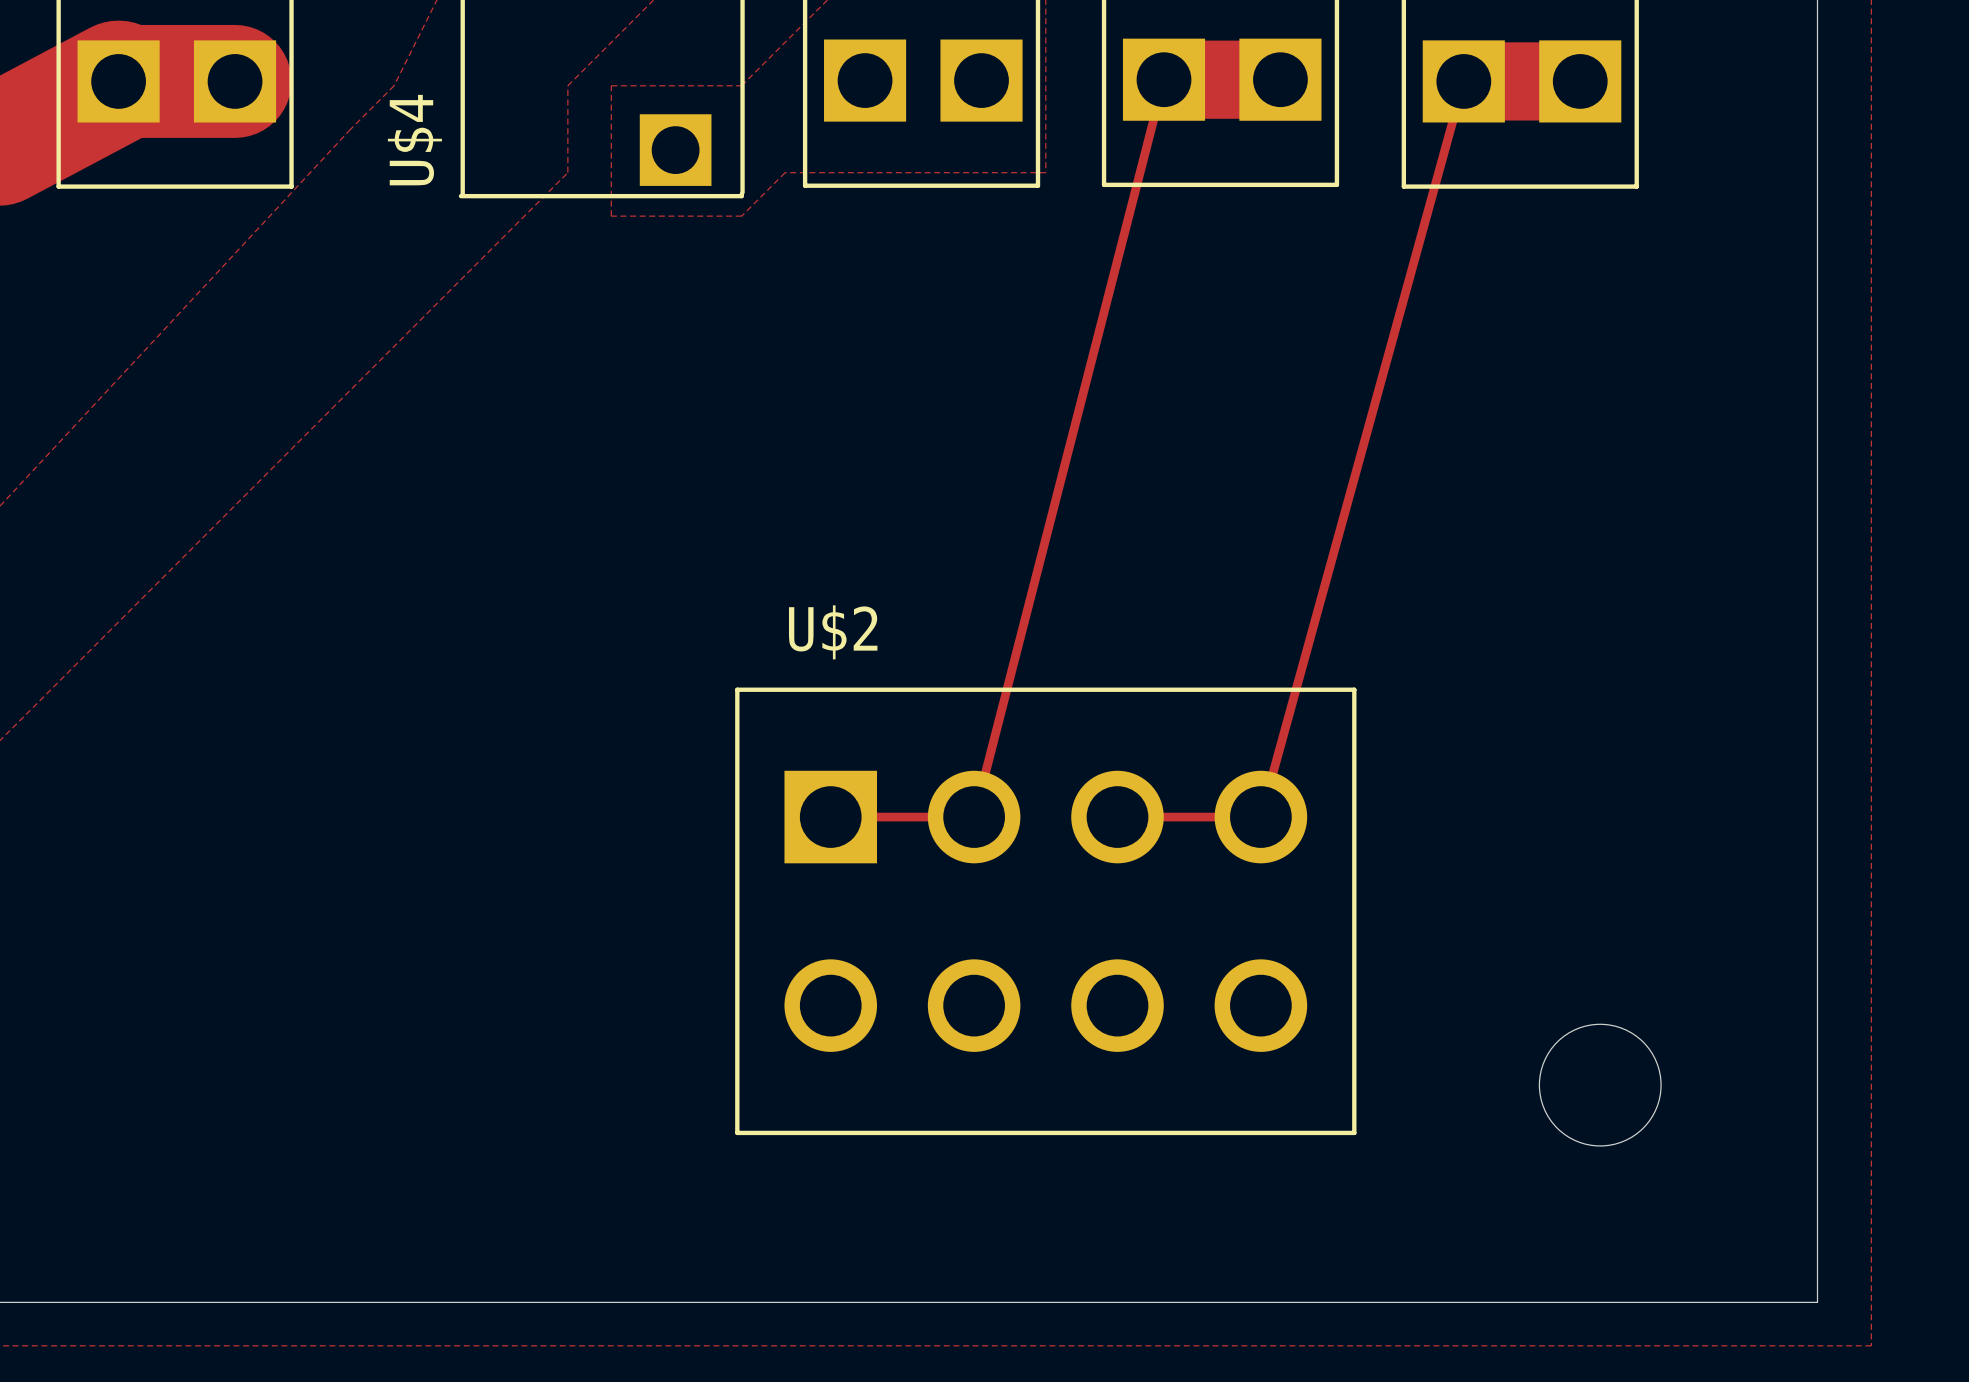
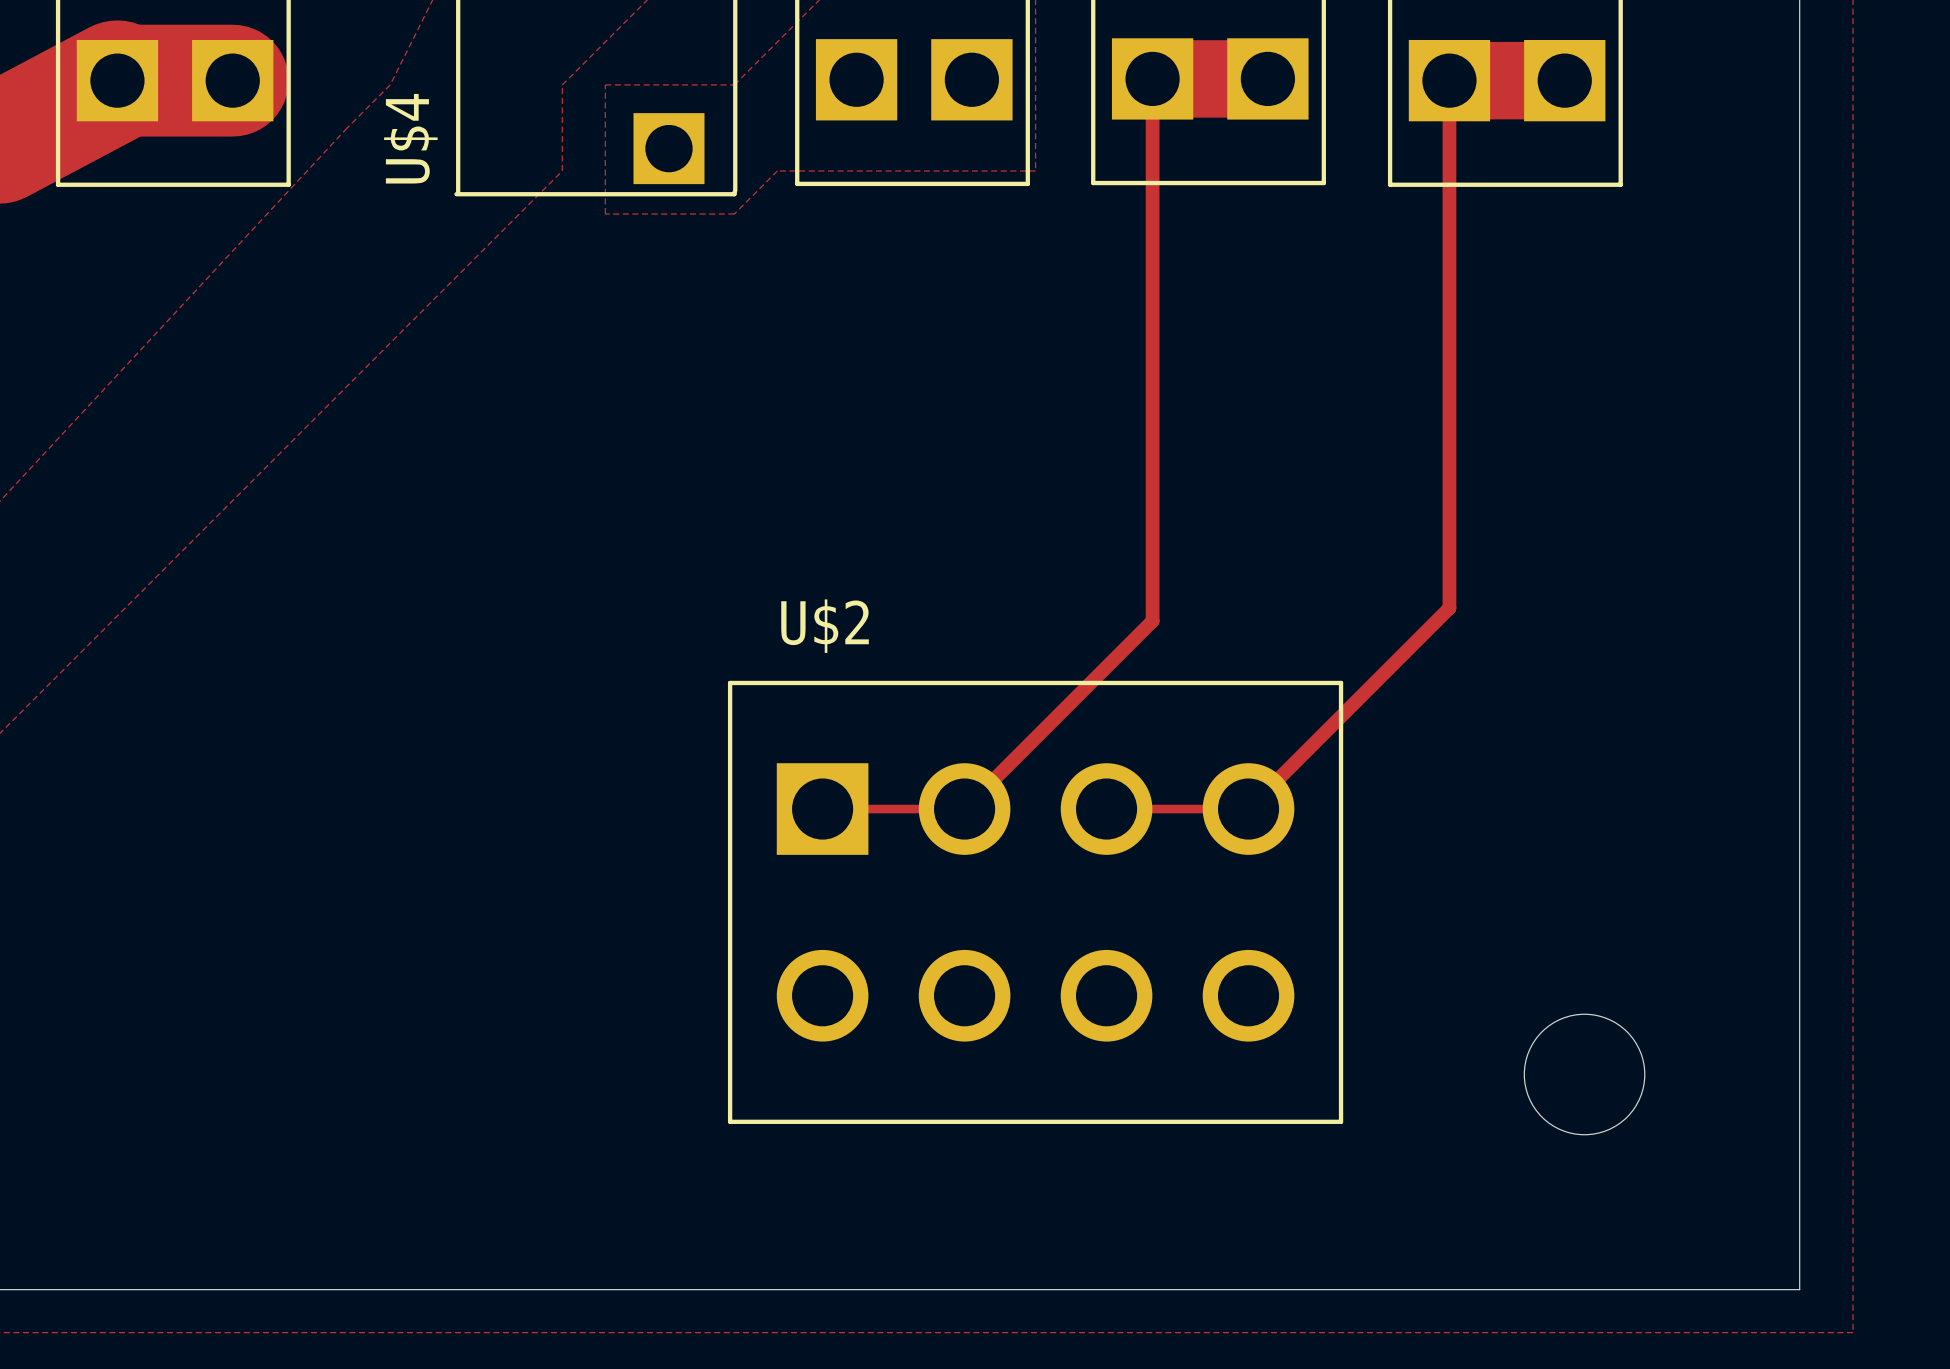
track: (1164, 79) (974, 817) -> (1152, 78) (1152, 621) (964, 809)
track: (1463, 81) (1260, 817) -> (1449, 80) (1449, 608) (1248, 809)

